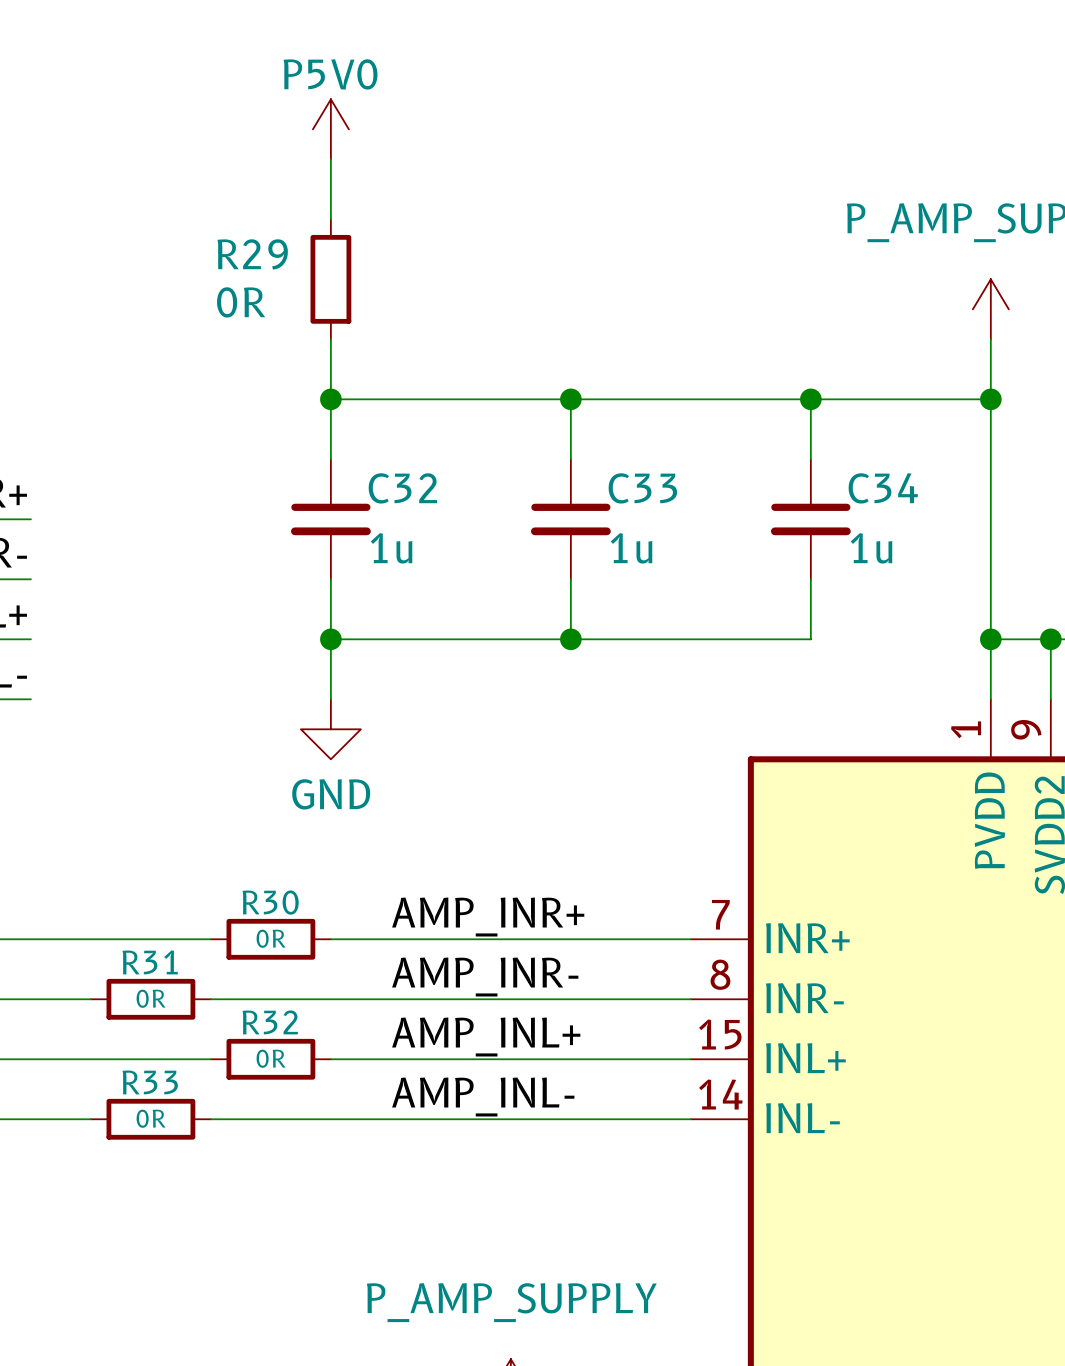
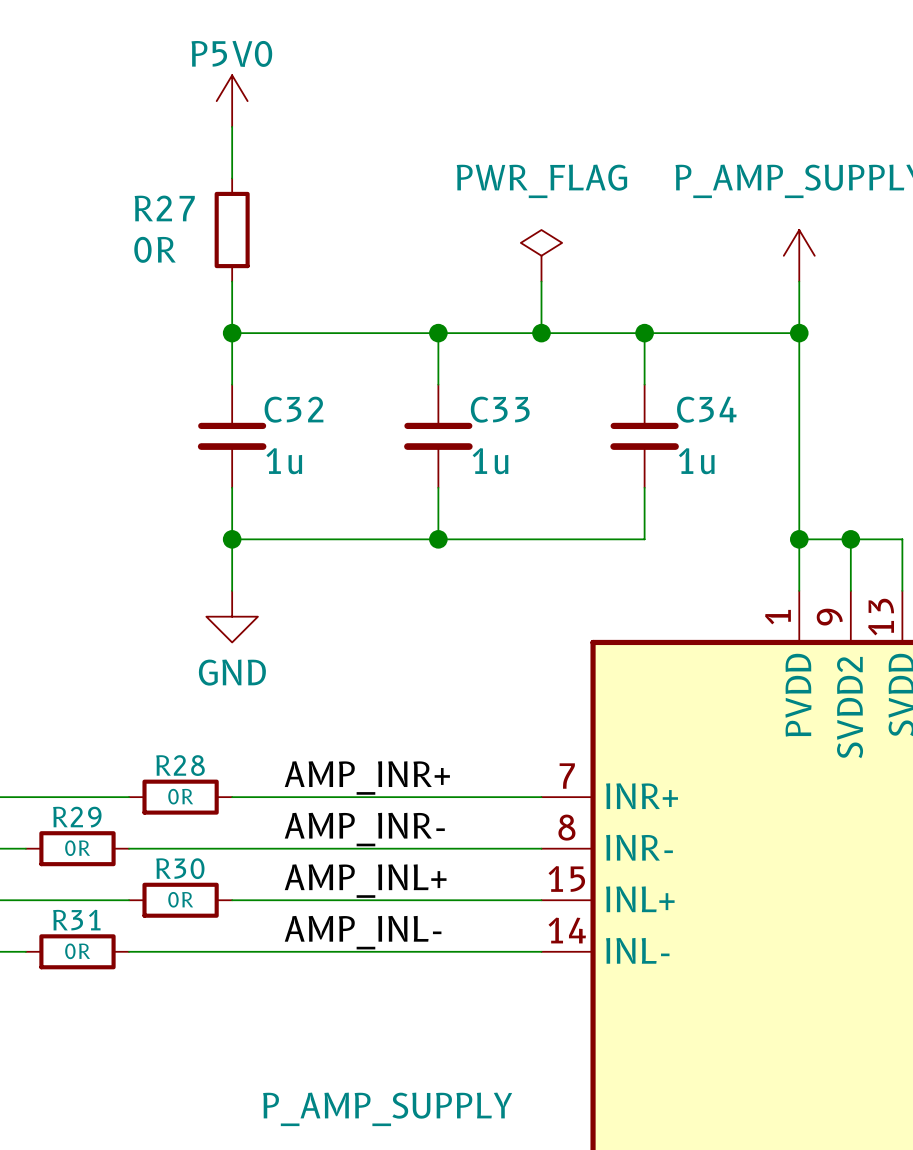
R29 name: R29 (252, 254) -> R27 (164, 208)
power symbol: none -> PWR_FLAG (541, 255)
wire: none -> (541, 281) (541, 333)
junction: none -> (541, 333)
R30 name: R30 (270, 902) -> R28 (180, 765)
R31 name: R31 (150, 962) -> R29 (77, 817)
R32 name: R32 (270, 1022) -> R30 (180, 868)
R33 name: R33 (150, 1082) -> R31 (76, 920)

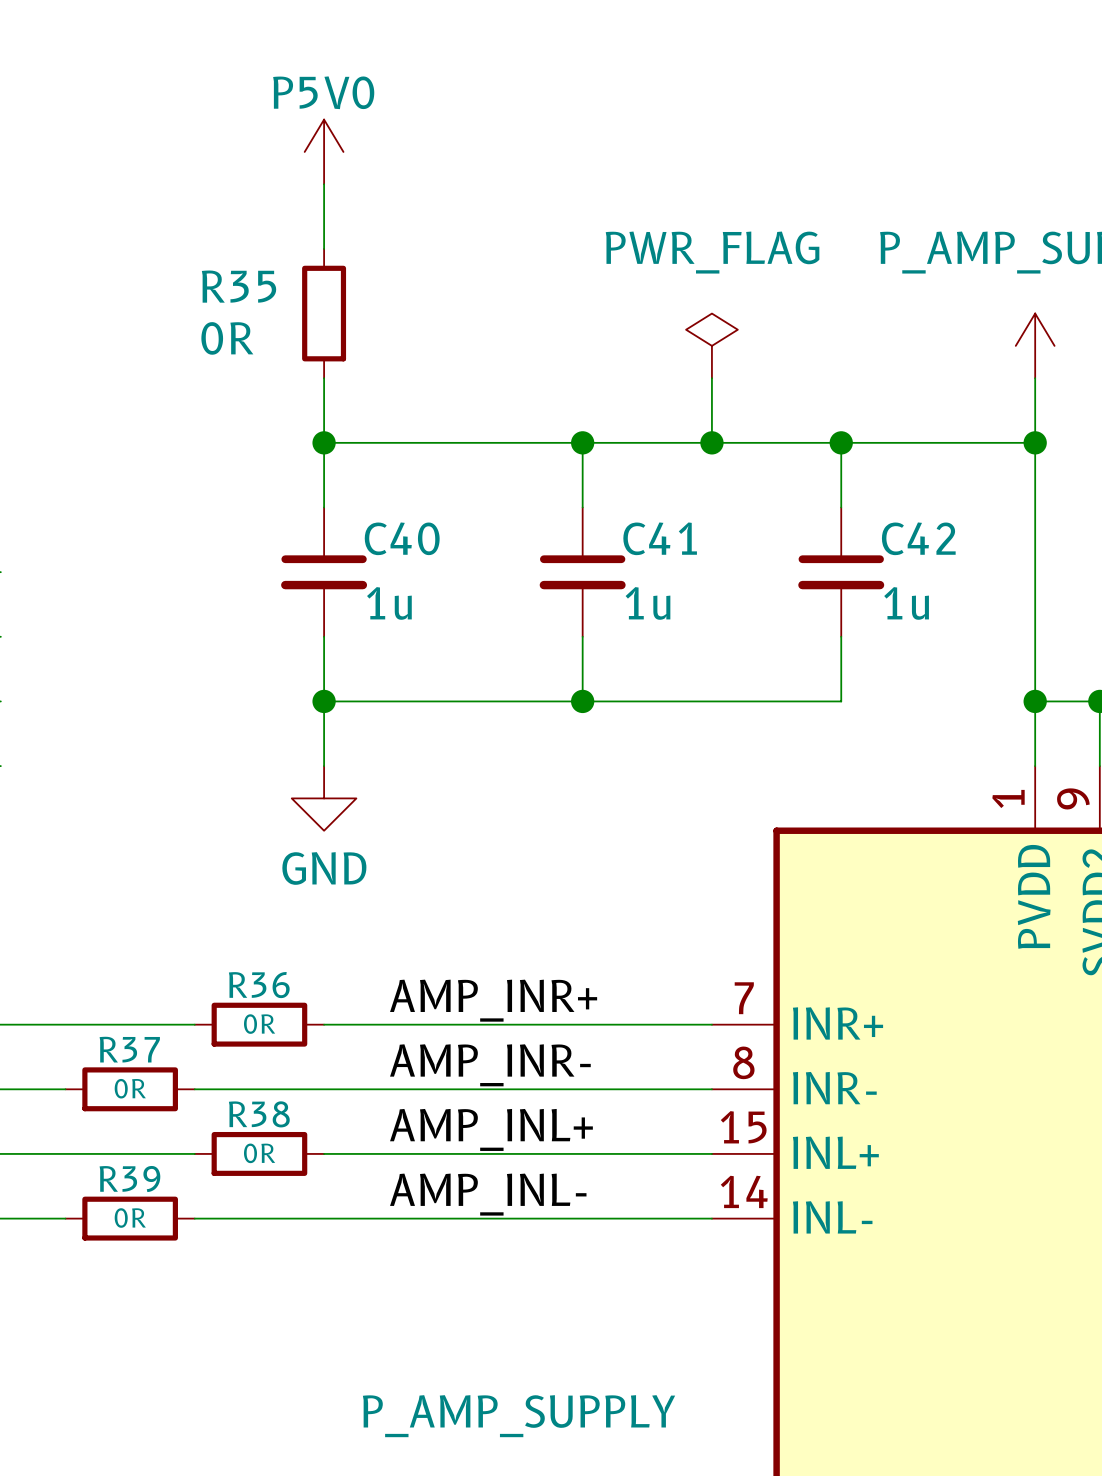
R27 name: R27 (164, 208) -> R35 (239, 286)
C32 name: C32 (293, 409) -> C40 (402, 538)
C33 name: C33 (500, 409) -> C41 (660, 538)
C34 name: C34 (706, 409) -> C42 (918, 538)
R28 name: R28 (180, 765) -> R36 (259, 985)
R29 name: R29 (77, 817) -> R37 (129, 1049)
R30 name: R30 (180, 868) -> R38 (259, 1114)
R31 name: R31 (76, 920) -> R39 (129, 1179)

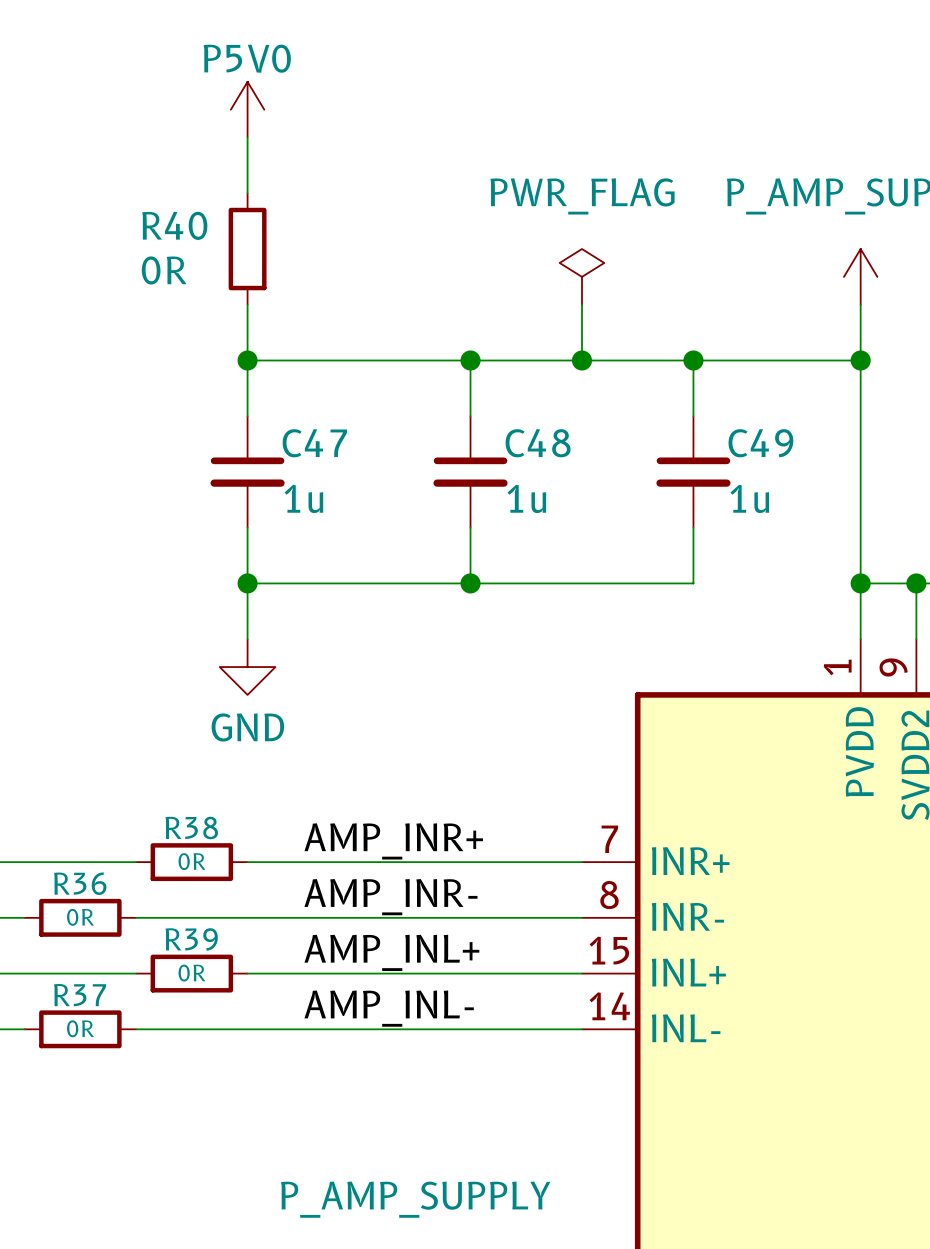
R35 name: R35 (239, 286) -> R40 (174, 225)
C40 name: C40 (402, 538) -> C47 (314, 443)
C41 name: C41 (660, 538) -> C48 (538, 443)
C42 name: C42 (918, 538) -> C49 (760, 443)
R36 name: R36 (259, 985) -> R38 (191, 827)
R37 name: R37 (129, 1049) -> R36 (80, 883)
R38 name: R38 (259, 1114) -> R39 (191, 939)
R39 name: R39 (129, 1179) -> R37 (80, 995)

